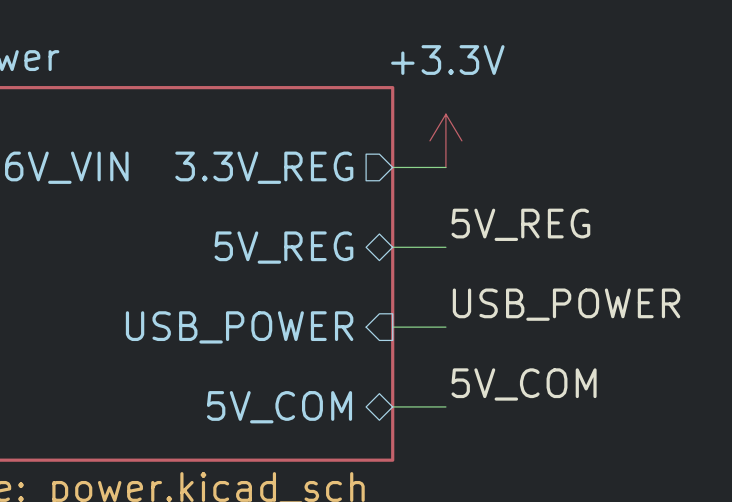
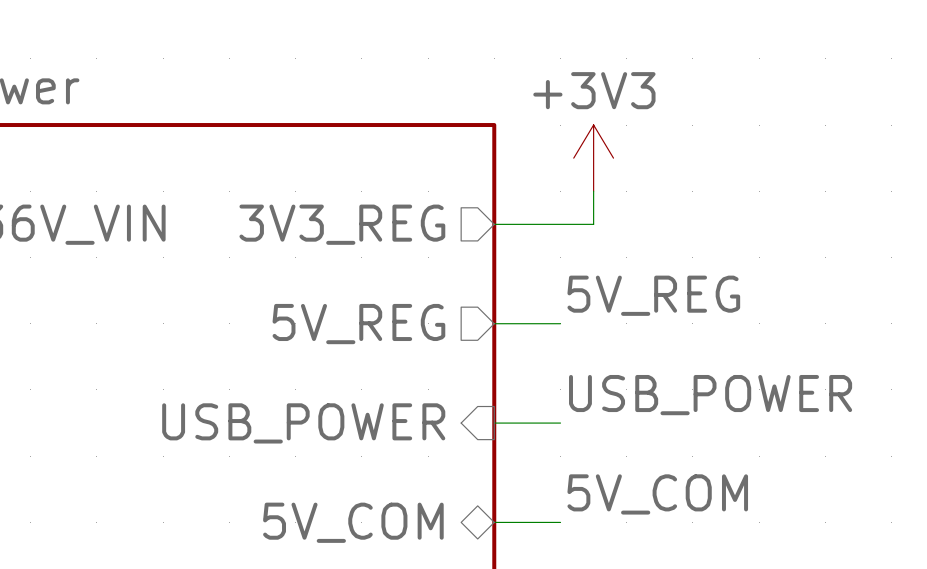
power symbol: none -> +3V3 (593, 158)
power symbol: +3.3V (445, 140) -> none
wire: none -> (593, 191) (593, 224) (560, 224)
sheet pin: 3.3V_REG (264, 167) -> 3V3_REG (342, 224)
sheet pin shape: bidirectional (283, 247) -> output (358, 324)

